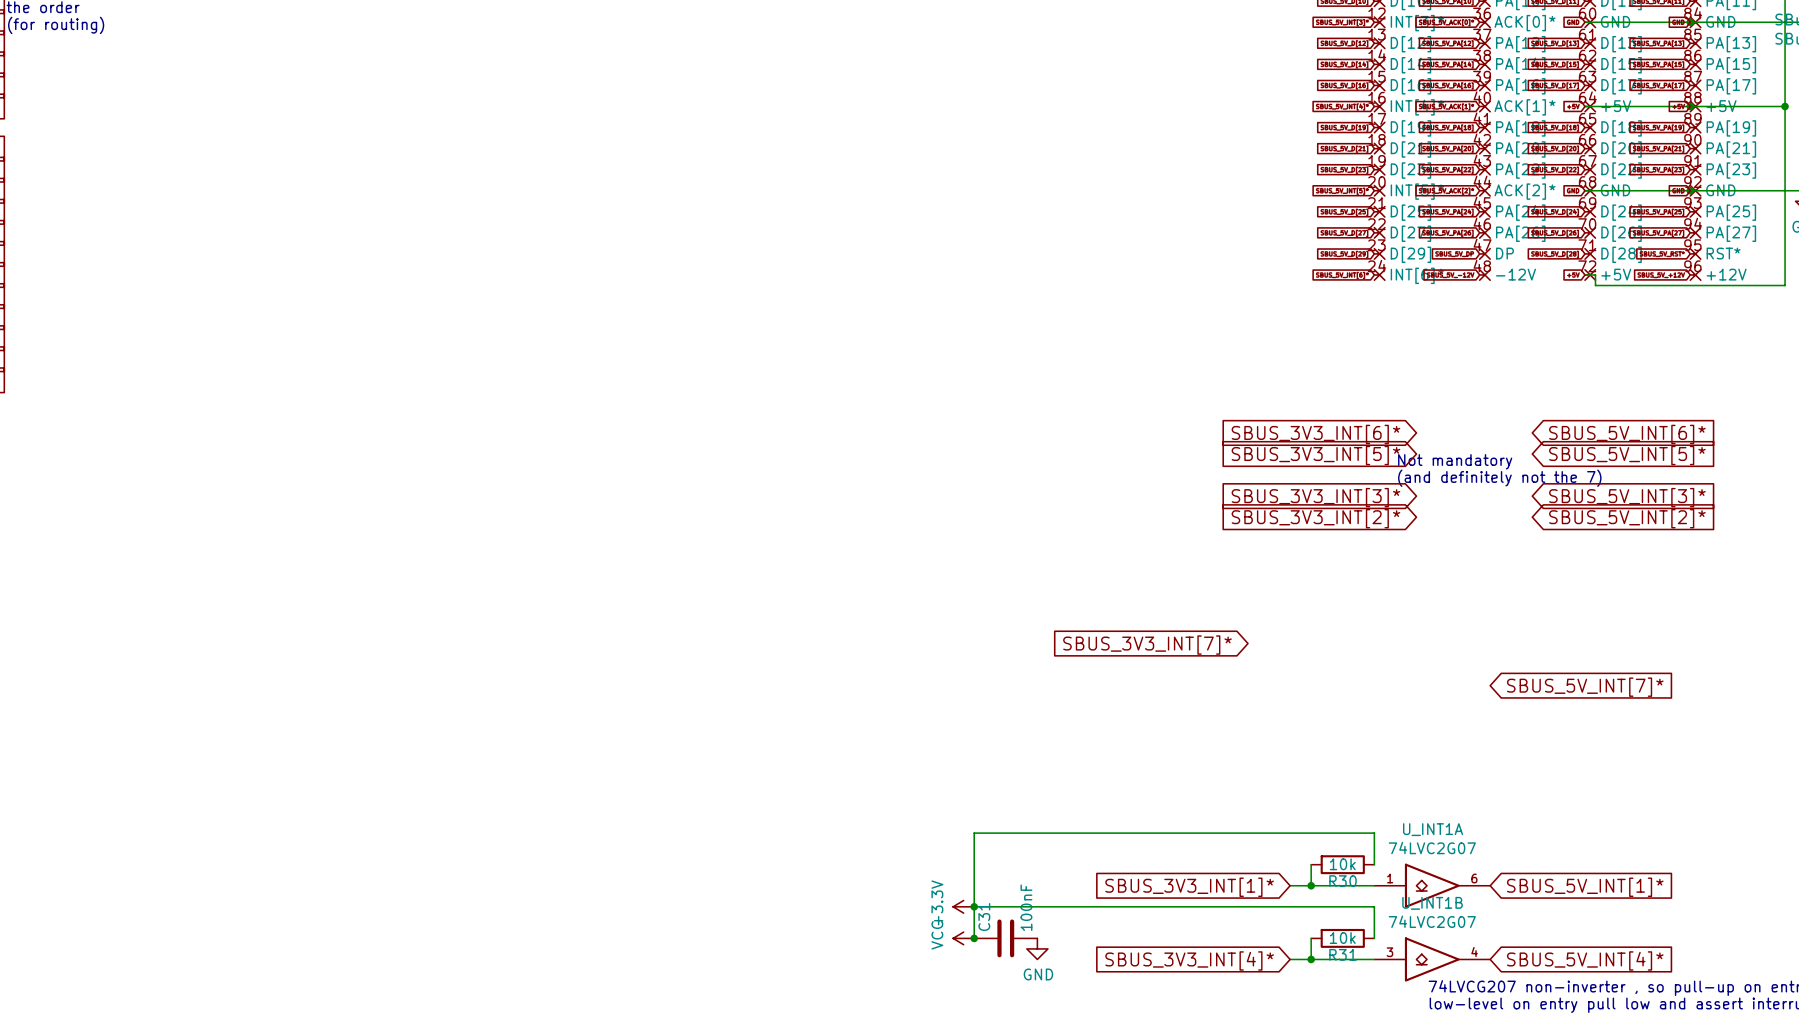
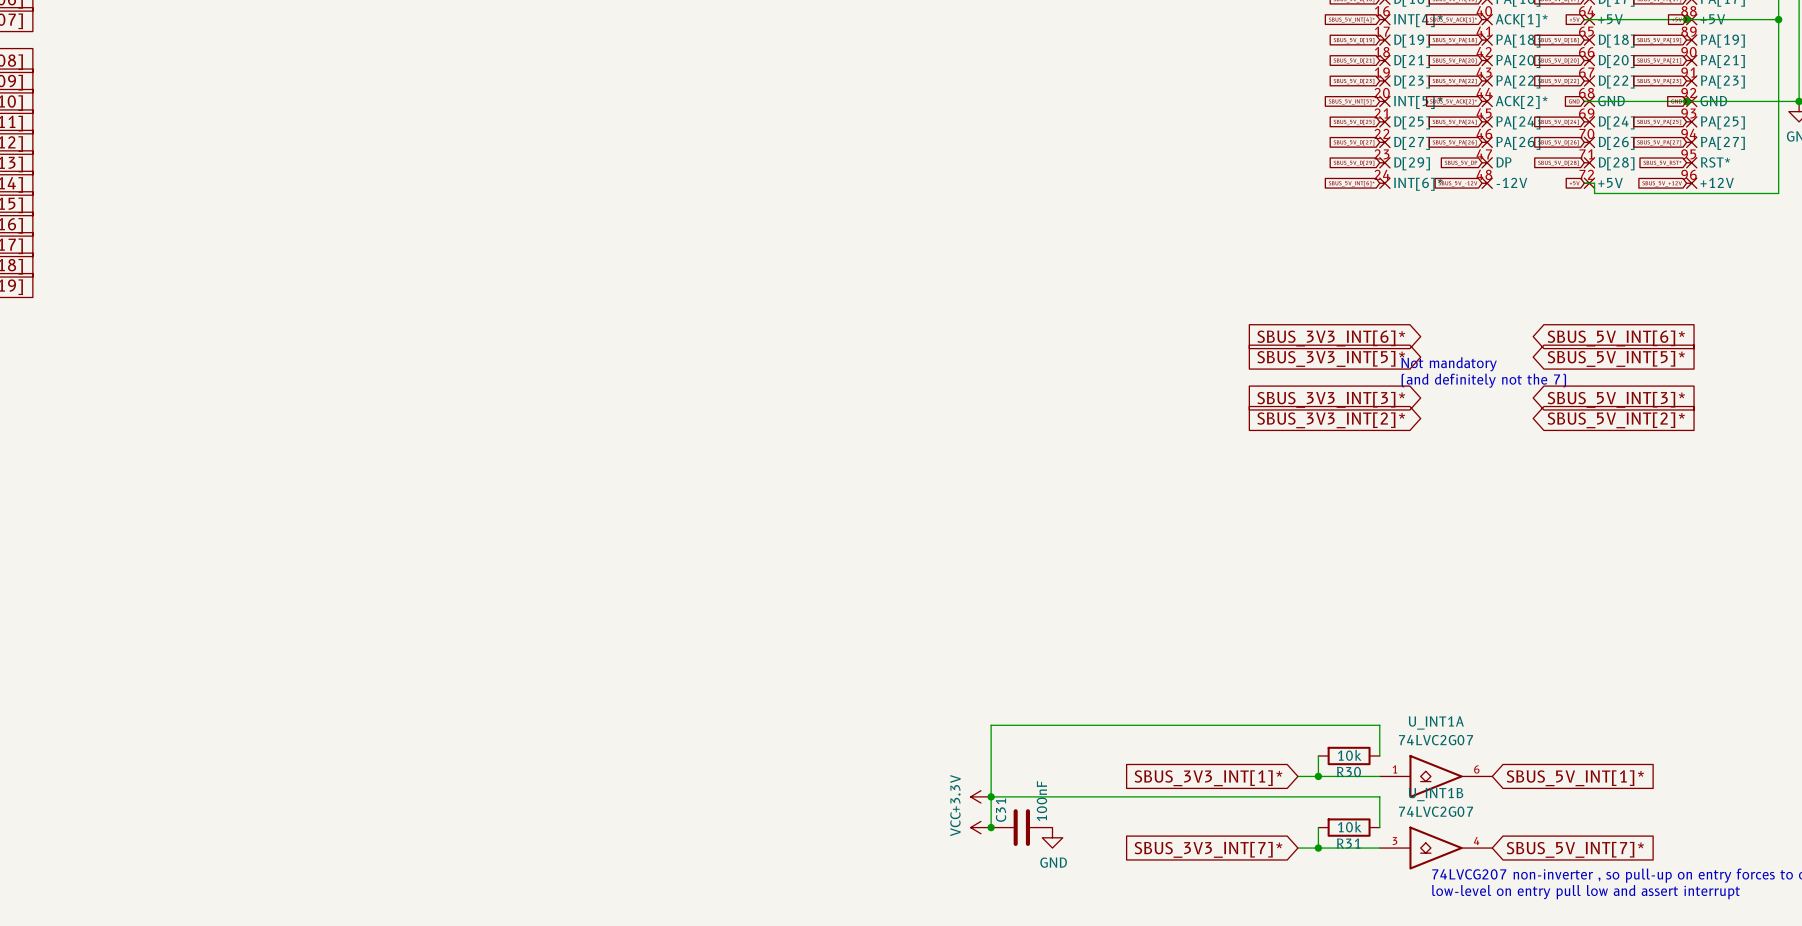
global label: SBUS_3V3_INT[7]* (1147, 645) -> none
global label: SBUS_5V_INT[7]* (1585, 687) -> none
global label: SBUS_3V3_INT[4]* (1189, 960) -> SBUS_3V3_INT[7]* (1208, 849)
global label: SBUS_5V_INT[4]* (1585, 960) -> SBUS_5V_INT[7]* (1575, 849)

